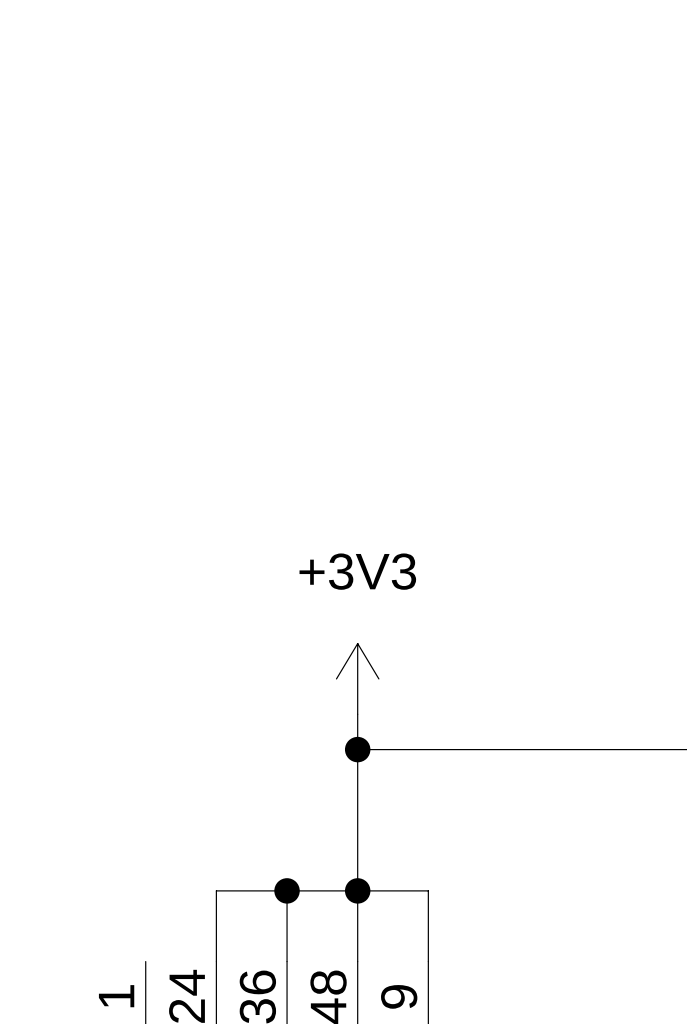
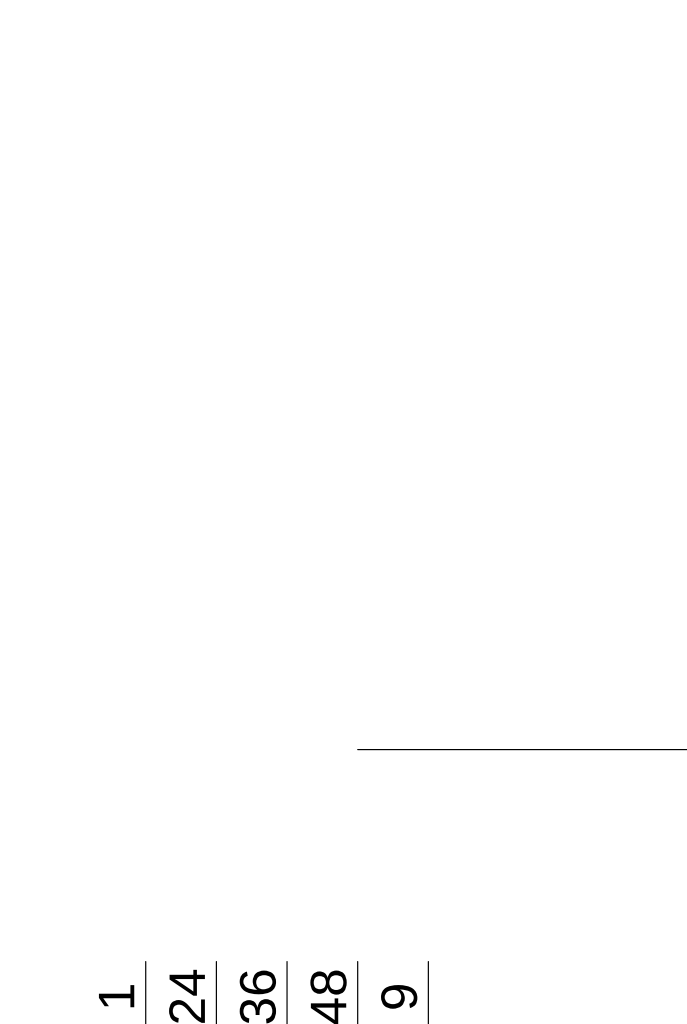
power symbol: +3V3 (357, 678) -> none
wire: (357, 714) (357, 961) -> none
junction: (357, 749) -> none
wire: (287, 890) (287, 961) -> none
junction: (287, 890) -> none
junction: (357, 890) -> none
wire: (216, 961) (216, 890) (428, 890) (428, 961) -> none

